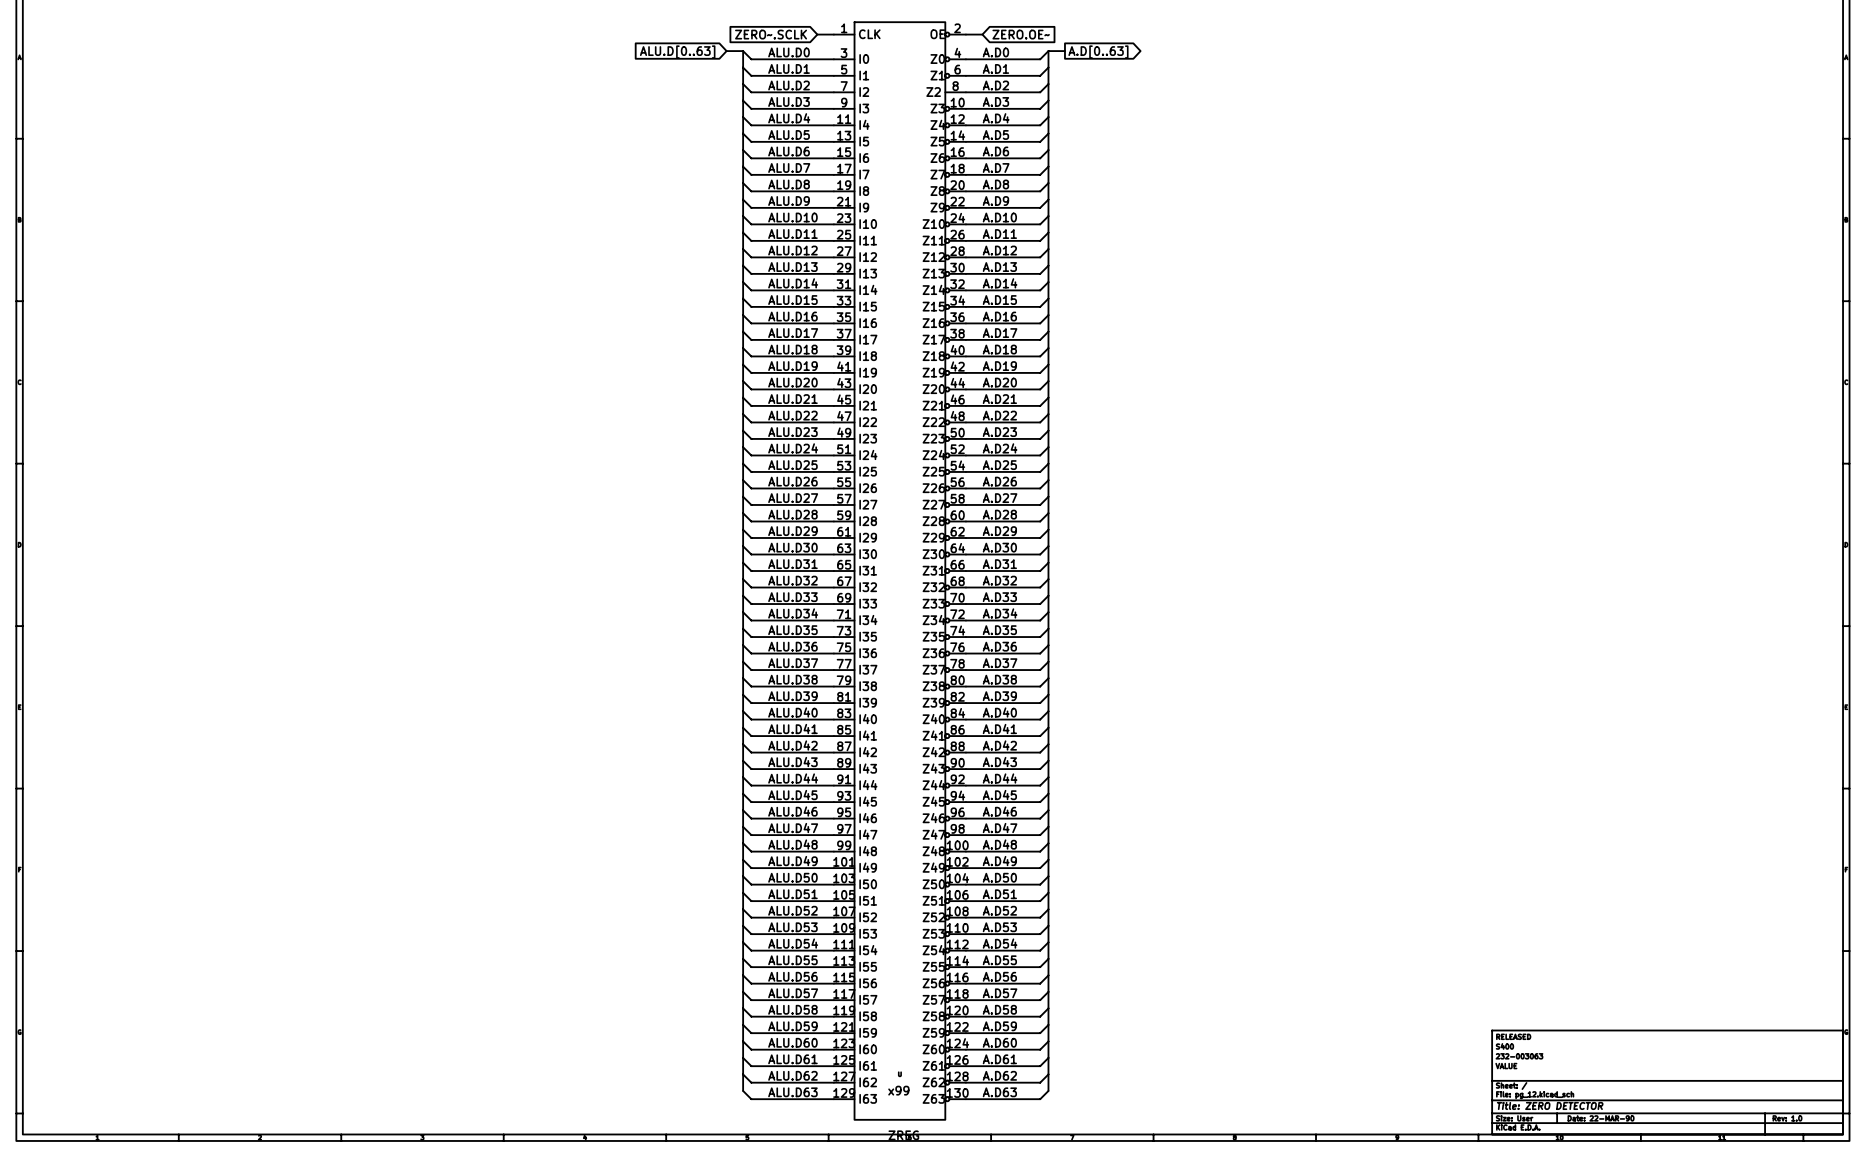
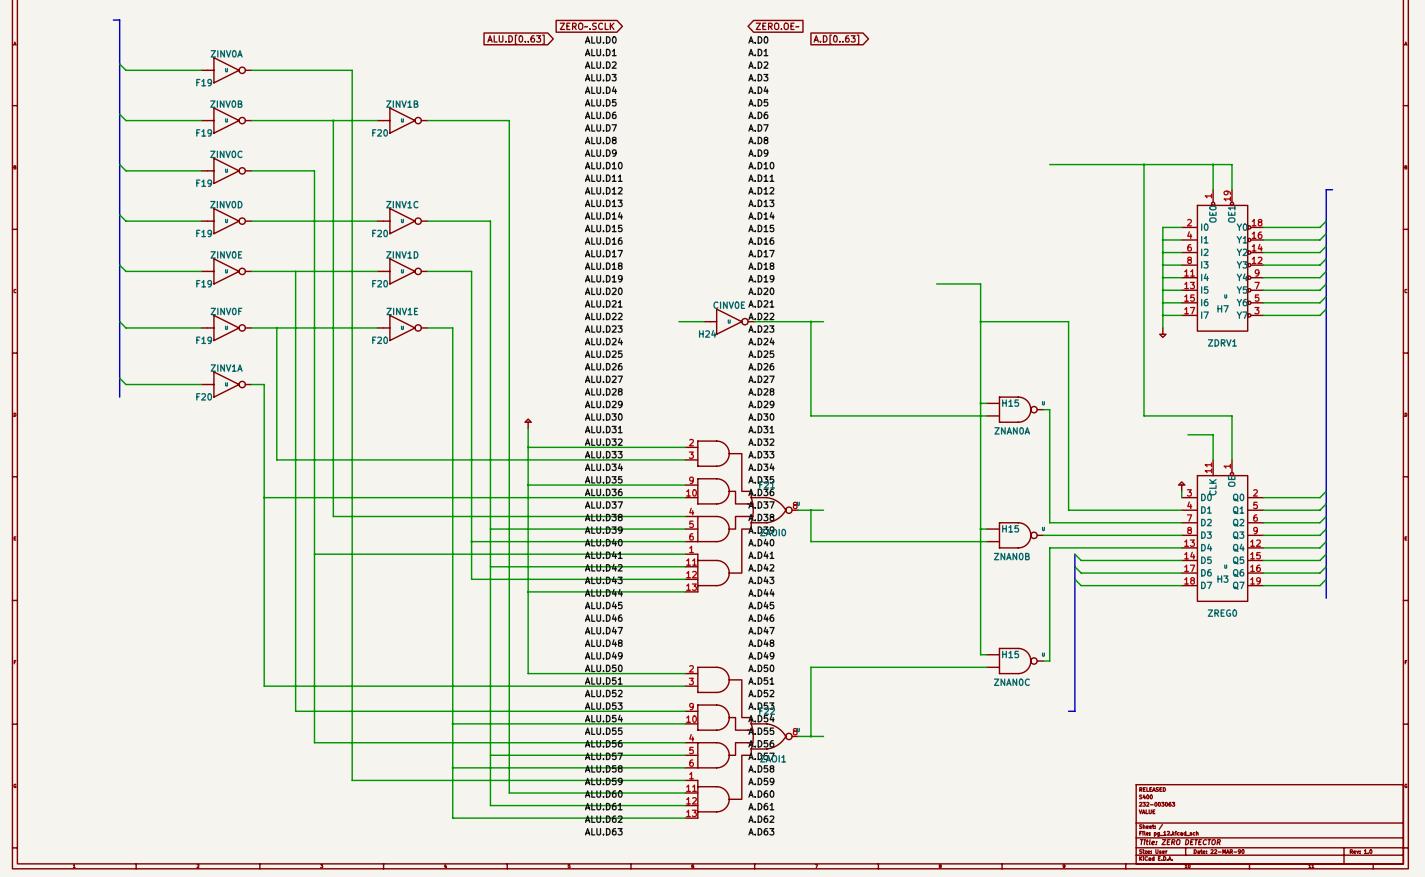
bus: none -> (113, 20) (119, 20) (119, 397)
wire: (817, 34) (833, 34) -> none
wire: (965, 34) (982, 34) -> none
bus: (726, 51) (743, 51) (743, 1090) -> none
wire: (743, 51) (751, 59) (833, 59) -> none
wire: (1048, 51) (1040, 59) (965, 59) -> none
bus: (1064, 51) (1048, 51) (1048, 1090) -> none
wire: (743, 67) (751, 75) (833, 75) -> none
wire: (1048, 67) (1040, 75) (965, 75) -> none
wire: none -> (119, 64) (125, 70) (201, 70)
wire: (743, 84) (751, 92) (833, 92) -> none
wire: (1048, 84) (1040, 92) (965, 92) -> none
part: none -> (226, 70)
wire: none -> (251, 70) (352, 70) (352, 780) (685, 780)
wire: (743, 100) (751, 108) (833, 108) -> none
wire: (1048, 100) (1040, 108) (965, 108) -> none
wire: (743, 117) (751, 125) (833, 125) -> none
wire: (1048, 117) (1040, 125) (965, 125) -> none
wire: (743, 133) (751, 141) (833, 141) -> none
wire: (1048, 133) (1040, 141) (965, 141) -> none
wire: none -> (119, 114) (125, 120) (201, 120)
wire: (743, 150) (751, 158) (833, 158) -> none
wire: (1048, 150) (1040, 158) (965, 158) -> none
part: none -> (226, 120)
wire: none -> (251, 120) (377, 120)
wire: none -> (333, 120) (333, 516) (685, 516)
part: none -> (402, 120)
wire: none -> (427, 120) (509, 120) (509, 793) (685, 793)
wire: (743, 166) (751, 174) (833, 174) -> none
wire: (1048, 166) (1040, 174) (965, 174) -> none
wire: (743, 183) (751, 191) (833, 191) -> none
wire: (1048, 183) (1040, 191) (965, 191) -> none
wire: (743, 199) (751, 207) (833, 207) -> none
wire: (1048, 199) (1040, 207) (965, 207) -> none
wire: none -> (119, 164) (125, 170) (201, 170)
wire: (743, 216) (751, 224) (833, 224) -> none
wire: (1048, 216) (1040, 224) (965, 224) -> none
wire: none -> (1049, 164) (1231, 164) (1231, 189)
wire: none -> (1144, 164) (1144, 415) (1231, 415) (1231, 459)
wire: none -> (1213, 164) (1213, 189)
part: none -> (226, 170)
wire: none -> (251, 170) (314, 170) (314, 742) (685, 742)
wire: (743, 232) (751, 240) (833, 240) -> none
wire: (1048, 232) (1040, 240) (965, 240) -> none
wire: (743, 249) (751, 257) (833, 257) -> none
wire: (1048, 249) (1040, 257) (965, 257) -> none
bus: none -> (1332, 189) (1326, 189) (1326, 598)
wire: (743, 265) (751, 273) (833, 273) -> none
wire: (1048, 265) (1040, 273) (965, 273) -> none
wire: none -> (119, 214) (125, 221) (201, 221)
wire: (743, 282) (751, 290) (833, 290) -> none
wire: (1048, 282) (1040, 290) (965, 290) -> none
part: none -> (226, 221)
wire: none -> (251, 221) (377, 221)
part: none -> (402, 221)
wire: none -> (427, 221) (490, 221) (490, 805) (685, 805)
wire: none -> (1326, 221) (1319, 227) (1263, 227)
wire: (743, 298) (751, 306) (833, 306) -> none
wire: (1048, 298) (1040, 306) (965, 306) -> none
wire: none -> (1181, 227) (1162, 227) (1162, 327)
wire: none -> (1326, 233) (1319, 239) (1263, 239)
wire: (743, 315) (751, 323) (833, 323) -> none
wire: (1048, 315) (1040, 323) (965, 323) -> none
wire: none -> (1162, 239) (1181, 239)
wire: none -> (1326, 246) (1319, 252) (1263, 252)
wire: (743, 331) (751, 339) (833, 339) -> none
wire: (1048, 331) (1040, 339) (965, 339) -> none
wire: none -> (1162, 252) (1181, 252)
wire: none -> (1326, 258) (1319, 265) (1263, 265)
part: none -> (1222, 260)
wire: none -> (119, 265) (125, 271) (201, 271)
wire: (743, 348) (751, 356) (833, 356) -> none
wire: (1048, 348) (1040, 356) (965, 356) -> none
wire: none -> (1162, 265) (1181, 265)
part: none -> (226, 271)
wire: none -> (251, 271) (377, 271)
part: none -> (402, 271)
wire: none -> (427, 271) (471, 271) (471, 579) (685, 579)
wire: none -> (1326, 271) (1319, 277) (1263, 277)
wire: (743, 364) (751, 372) (833, 372) -> none
wire: (1048, 364) (1040, 372) (965, 372) -> none
wire: none -> (1162, 277) (1181, 277)
wire: none -> (936, 283) (980, 283) (980, 654) (986, 654)
wire: none -> (1326, 283) (1319, 290) (1263, 290)
wire: (743, 381) (751, 389) (833, 389) -> none
wire: (1048, 381) (1040, 389) (965, 389) -> none
wire: none -> (1162, 290) (1181, 290)
wire: none -> (1326, 296) (1319, 302) (1263, 302)
wire: (743, 397) (751, 405) (833, 405) -> none
wire: (1048, 397) (1040, 405) (965, 405) -> none
wire: none -> (1162, 302) (1181, 302)
wire: none -> (1326, 309) (1319, 315) (1263, 315)
wire: (743, 414) (751, 422) (833, 422) -> none
wire: (1048, 414) (1040, 422) -> (823, 321) (792, 321)
wire: none -> (1162, 315) (1181, 315)
wire: none -> (119, 321) (125, 327) (201, 327)
wire: none -> (678, 321) (704, 321)
part: none -> (729, 321)
wire: none -> (810, 321) (810, 415) (986, 415)
wire: none -> (980, 321) (1068, 321) (1068, 510) (1181, 510)
part: none -> (226, 327)
wire: none -> (251, 327) (377, 327)
part: none -> (402, 327)
wire: none -> (427, 327) (452, 327) (452, 818) (685, 818)
wire: (743, 430) (751, 438) (833, 438) -> none
wire: (1048, 430) (1040, 438) (965, 438) -> none
power symbol: none -> (1162, 332)
wire: (743, 447) (751, 455) (833, 455) -> none
wire: (1048, 447) (1040, 455) (965, 455) -> none
wire: (743, 463) (751, 471) (833, 471) -> none
wire: (1048, 463) (1040, 471) (965, 471) -> none
wire: (743, 480) (751, 488) (833, 488) -> none
wire: (1048, 480) (1040, 488) (965, 488) -> none
wire: none -> (119, 378) (125, 384) (201, 384)
wire: (743, 496) (751, 504) (833, 504) -> none
wire: (1048, 496) (1040, 504) (965, 504) -> none
part: none -> (226, 384)
wire: (743, 513) (751, 521) (833, 521) -> none
wire: (1048, 513) (1040, 521) (965, 521) -> none
wire: (743, 529) (751, 537) (833, 537) -> none
wire: (1048, 529) (1040, 537) (965, 537) -> none
wire: none -> (980, 403) (986, 403)
part: none -> (1015, 409)
wire: none -> (1043, 409) (1049, 409) (1049, 522) (1181, 522)
wire: (743, 546) (751, 554) (833, 554) -> none
wire: (1048, 546) (1040, 554) (965, 554) -> none
power symbol: none -> (528, 423)
wire: (743, 562) (751, 571) (833, 571) -> none
wire: (1048, 562) (1040, 571) (965, 571) -> none
part: (899, 571) -> none
wire: none -> (1187, 434) (1213, 434) (1213, 459)
wire: (743, 579) (751, 587) -> (528, 447) (572, 447)
wire: (1048, 579) (1040, 587) (965, 587) -> none
wire: none -> (634, 447) (685, 447)
wire: (743, 595) (751, 604) -> (276, 327) (276, 459) (572, 459)
wire: (1048, 595) (1040, 604) (965, 604) -> none
wire: none -> (634, 459) (685, 459)
wire: (743, 612) (751, 620) (833, 620) -> none
wire: (1048, 612) (1040, 620) (965, 620) -> none
wire: (743, 628) (751, 637) -> (528, 485) (572, 485)
wire: (1048, 628) (1040, 637) (965, 637) -> none
wire: none -> (634, 485) (685, 485)
power symbol: none -> (1181, 486)
wire: (743, 645) (751, 653) -> (264, 497) (572, 497)
wire: (1048, 645) (1040, 653) (965, 653) -> none
wire: none -> (1181, 491) (1181, 497)
wire: none -> (1326, 491) (1319, 497) (1263, 497)
wire: none -> (634, 497) (685, 497)
wire: (743, 661) (751, 670) (833, 670) -> none
wire: (1048, 661) (1040, 670) (965, 670) -> none
wire: none -> (1326, 503) (1319, 510) (1263, 510)
wire: none -> (798, 510) (823, 510)
wire: none -> (810, 510) (810, 541) (986, 541)
wire: (743, 678) (751, 686) (833, 686) -> none
part: none -> (741, 516)
wire: (1048, 678) (1040, 686) (965, 686) -> none
wire: none -> (1326, 516) (1319, 522) (1263, 522)
wire: none -> (490, 529) (685, 529)
wire: (743, 694) (751, 703) (833, 703) -> none
wire: (1048, 694) (1040, 703) (965, 703) -> none
wire: none -> (980, 529) (986, 529)
wire: none -> (1326, 529) (1319, 535) (1263, 535)
part: none -> (1222, 530)
part: none -> (1015, 535)
wire: none -> (1043, 535) (1181, 535)
wire: none -> (471, 541) (685, 541)
wire: (743, 711) (751, 719) (833, 719) -> none
wire: (1048, 711) (1040, 719) (965, 719) -> none
wire: none -> (1326, 541) (1319, 547) (1263, 547)
wire: none -> (1181, 547) (1049, 547) (1049, 661) (1043, 661)
wire: none -> (314, 554) (685, 554)
wire: (743, 727) (751, 736) (833, 736) -> none
wire: (1048, 727) (1040, 736) (965, 736) -> none
wire: none -> (1074, 554) (1081, 560) (1181, 560)
bus: none -> (1074, 554) (1074, 711) (1068, 711)
wire: none -> (1326, 554) (1319, 560) (1263, 560)
wire: none -> (490, 566) (685, 566)
wire: (743, 744) (751, 752) (833, 752) -> none
wire: (1048, 744) (1040, 752) (965, 752) -> none
wire: none -> (1074, 566) (1081, 573) (1181, 573)
wire: none -> (1326, 566) (1319, 573) (1263, 573)
wire: (743, 760) (751, 769) (833, 769) -> none
wire: (1048, 760) (1040, 769) (965, 769) -> none
wire: none -> (1074, 579) (1081, 585) (1181, 585)
wire: none -> (1326, 579) (1319, 585) (1263, 585)
wire: none -> (528, 591) (685, 591)
wire: (743, 777) (751, 785) (833, 785) -> none
wire: (1048, 777) (1040, 785) (965, 785) -> none
wire: (743, 793) (751, 802) (833, 802) -> none
wire: (1048, 793) (1040, 802) (965, 802) -> none
wire: (743, 810) (751, 818) (833, 818) -> none
wire: (1048, 810) (1040, 818) (965, 818) -> none
wire: (743, 826) (751, 835) (833, 835) -> none
wire: (1048, 826) (1040, 835) (965, 835) -> none
wire: (743, 843) (751, 851) (833, 851) -> none
wire: (1048, 843) (1040, 851) (965, 851) -> none
wire: (743, 859) (751, 868) (833, 868) -> none
wire: (1048, 859) (1040, 868) (965, 868) -> none
part: none -> (1015, 661)
wire: (743, 876) (751, 884) -> (528, 428) (528, 673) (572, 673)
wire: (1048, 876) (1040, 884) (965, 884) -> none
wire: none -> (986, 667) (810, 667) (810, 736)
wire: none -> (634, 673) (685, 673)
wire: (743, 892) (751, 901) -> (251, 384) (264, 384) (264, 686) (572, 686)
wire: (1048, 892) (1040, 901) (965, 901) -> none
wire: none -> (634, 686) (685, 686)
wire: (743, 909) (751, 917) (833, 917) -> none
wire: (1048, 909) (1040, 917) (965, 917) -> none
wire: (743, 925) (751, 934) -> (295, 271) (295, 711) (572, 711)
wire: (1048, 925) (1040, 934) (965, 934) -> none
wire: none -> (634, 711) (685, 711)
wire: (743, 942) (751, 950) -> (452, 723) (572, 723)
wire: (1048, 942) (1040, 950) (965, 950) -> none
wire: none -> (634, 723) (685, 723)
wire: (743, 958) (751, 967) (833, 967) -> none
wire: (1048, 958) (1040, 967) (965, 967) -> none
wire: none -> (798, 736) (823, 736)
wire: (743, 975) (751, 983) (833, 983) -> none
part: none -> (741, 742)
wire: (1048, 975) (1040, 983) (965, 983) -> none
wire: none -> (490, 755) (685, 755)
wire: (743, 991) (751, 1000) (833, 1000) -> none
wire: (1048, 991) (1040, 1000) (965, 1000) -> none
wire: none -> (452, 767) (685, 767)
wire: (743, 1008) (751, 1016) (833, 1016) -> none
wire: (1048, 1008) (1040, 1016) (965, 1016) -> none
wire: (743, 1024) (751, 1033) (833, 1033) -> none
wire: (1048, 1024) (1040, 1033) (965, 1033) -> none
wire: (743, 1041) (751, 1049) (833, 1049) -> none
wire: (1048, 1041) (1040, 1049) (965, 1049) -> none
wire: (743, 1057) (751, 1066) (833, 1066) -> none
wire: (1048, 1057) (1040, 1066) (965, 1066) -> none
wire: (743, 1074) (751, 1082) (833, 1082) -> none
wire: (1048, 1074) (1040, 1082) (965, 1082) -> none
wire: (743, 1090) (751, 1099) (833, 1099) -> none
wire: (1048, 1090) (1040, 1099) (965, 1099) -> none

